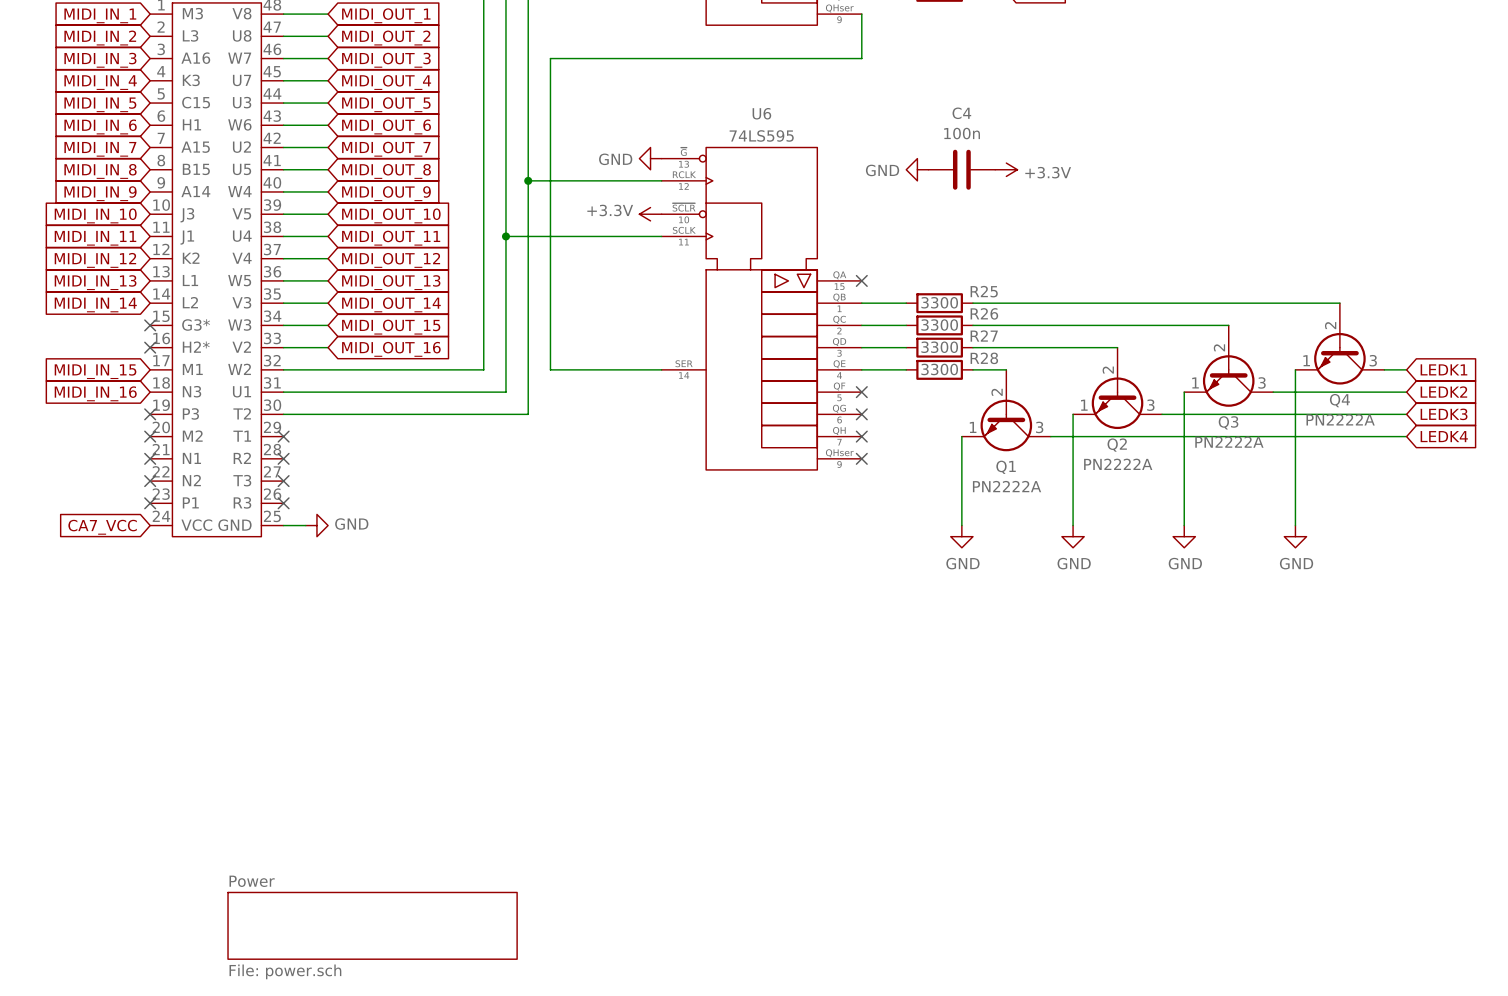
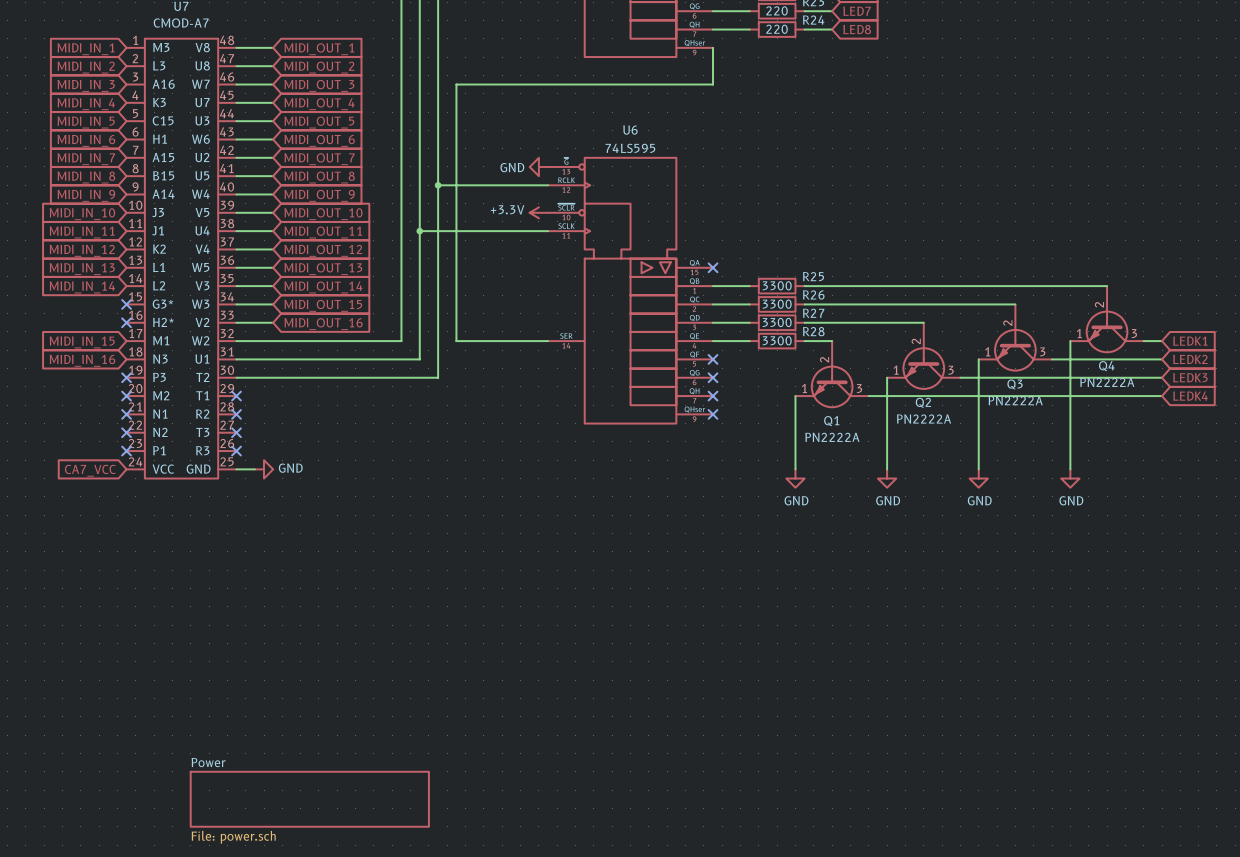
power symbol: GND (917, 169) -> none
C4: 100n (961, 169) -> none
power symbol: +3.3V (1006, 169) -> none

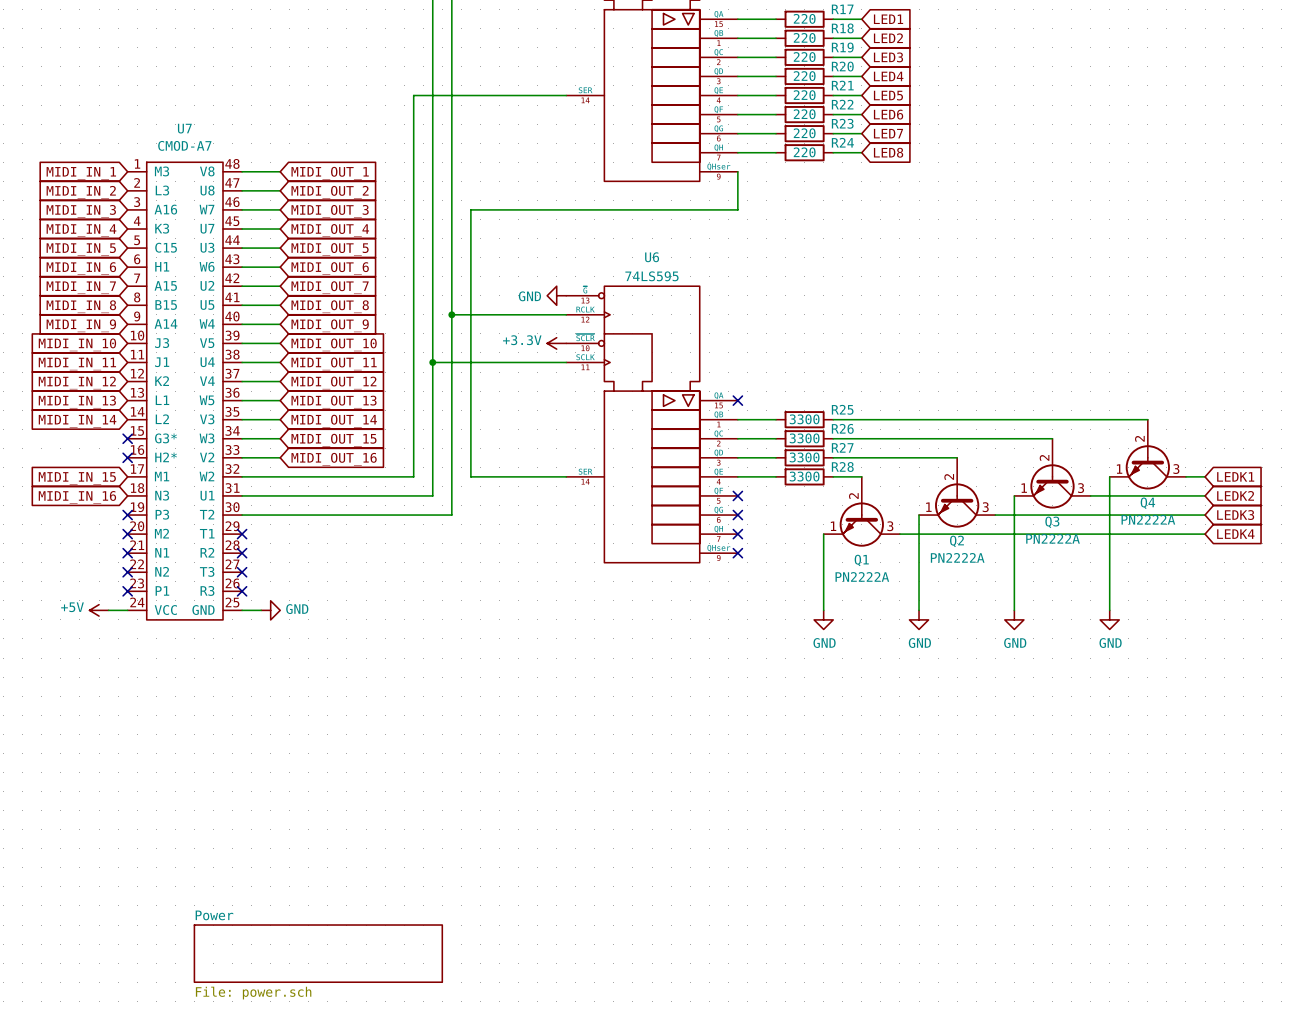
power symbol: none -> +5V (99, 610)
wire: none -> (108, 610) (127, 610)
global label: CA7_VCC (90, 470) -> none

